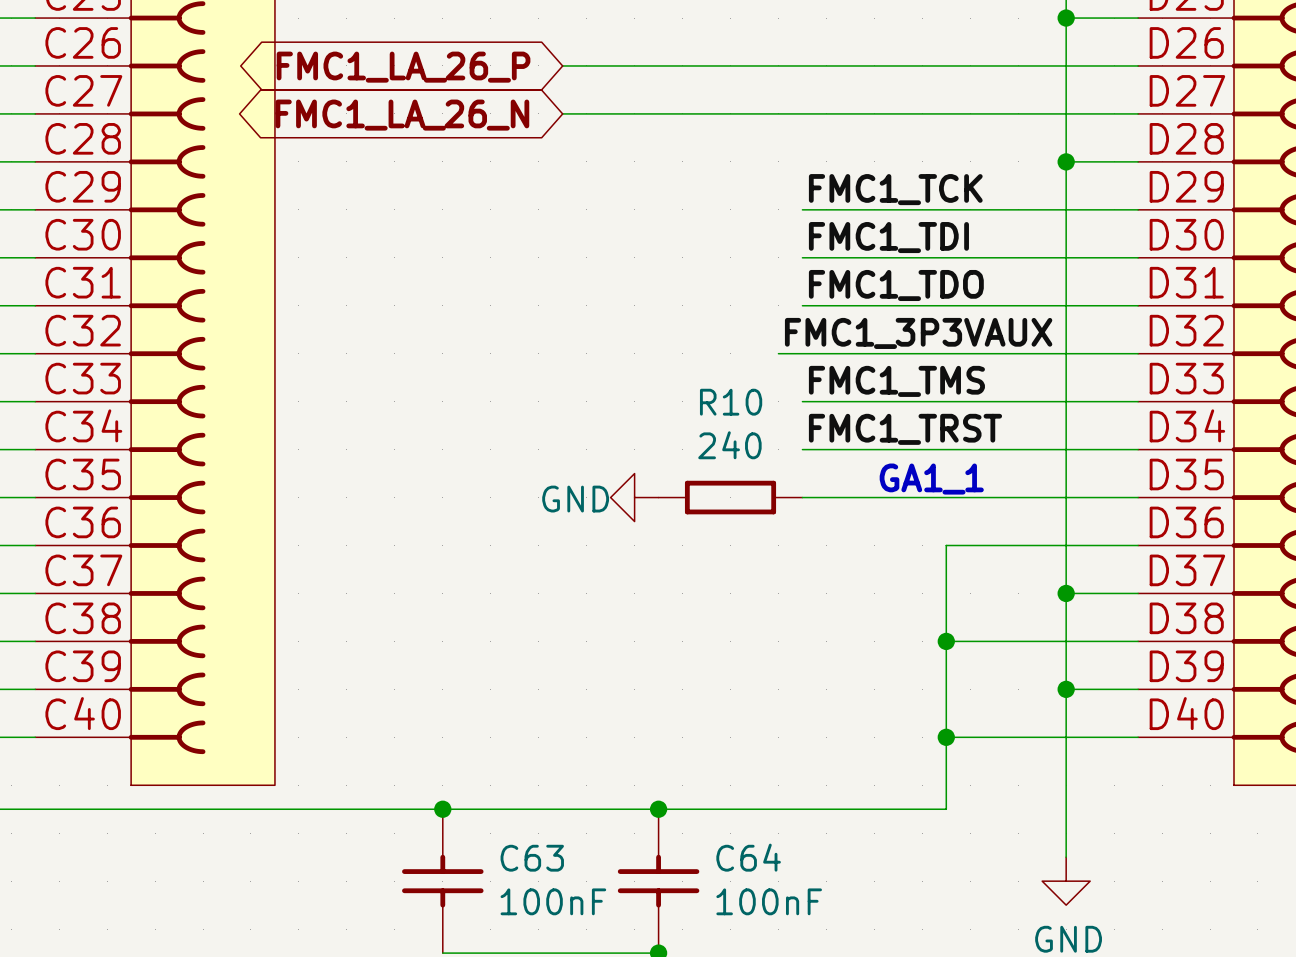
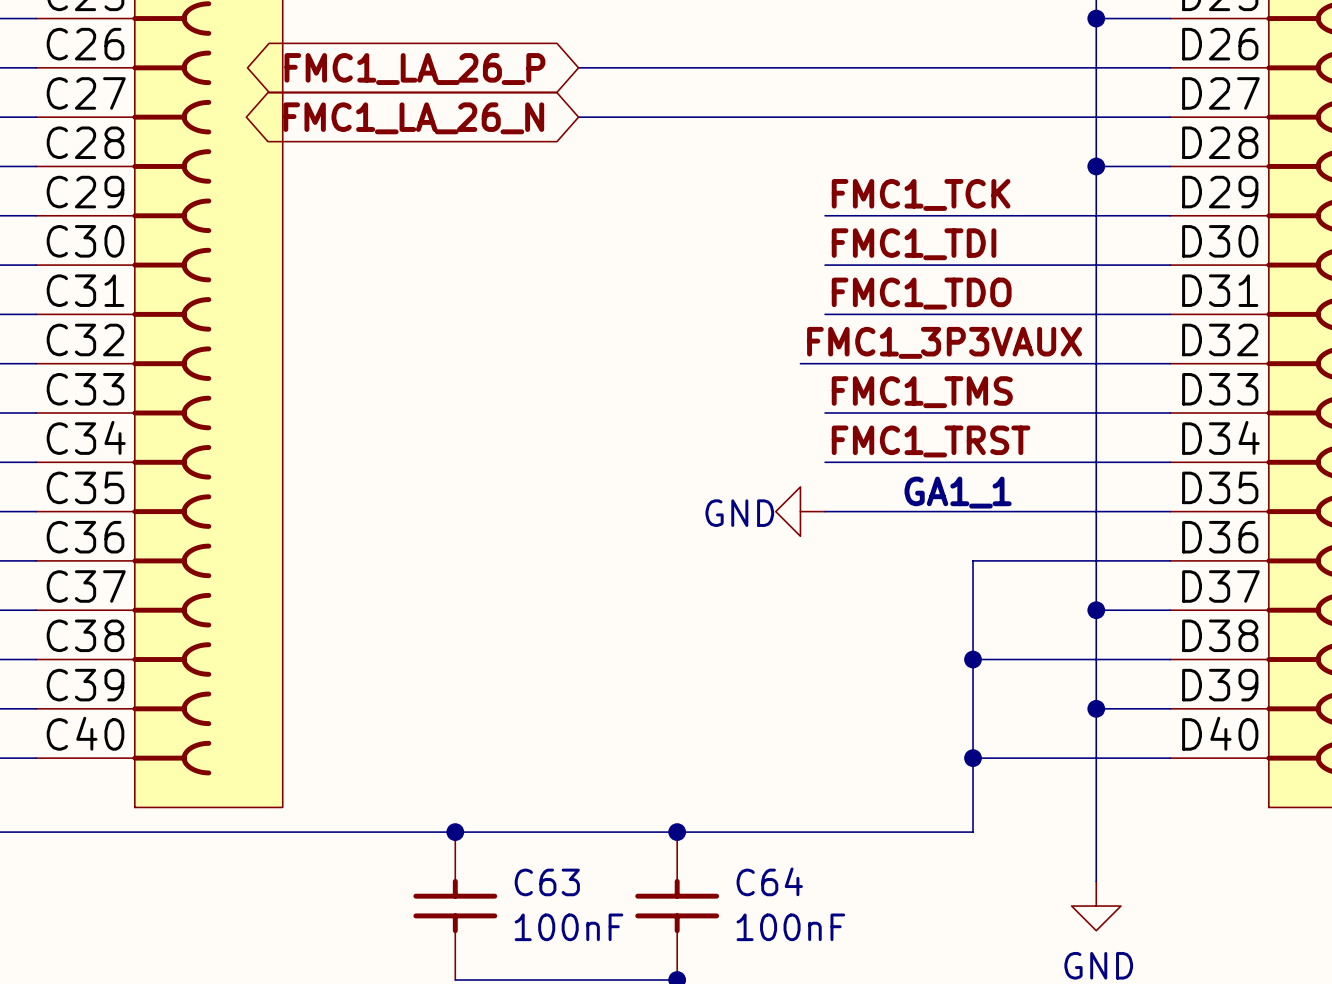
power symbol position: GND (634, 497) -> GND (800, 511)
R10: (730, 497) -> none

